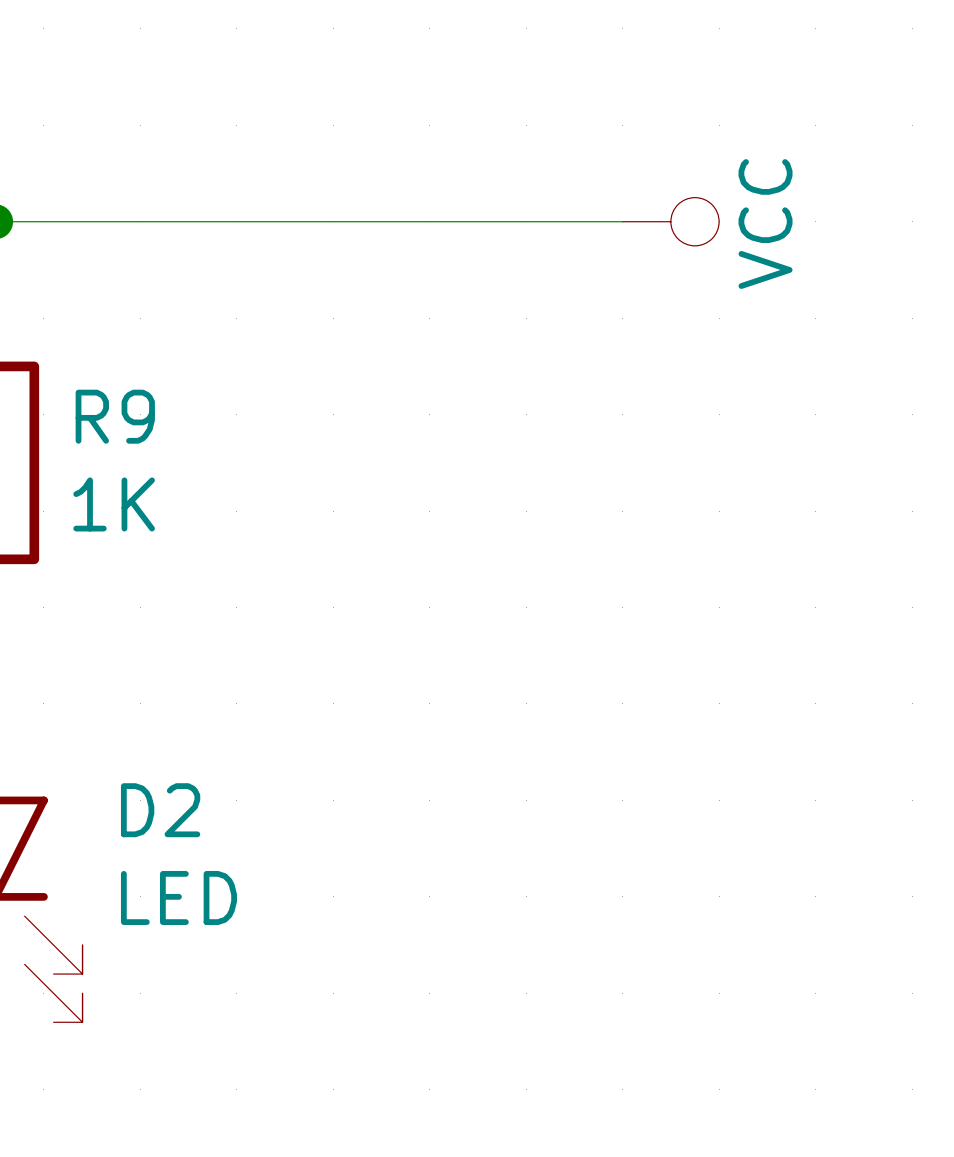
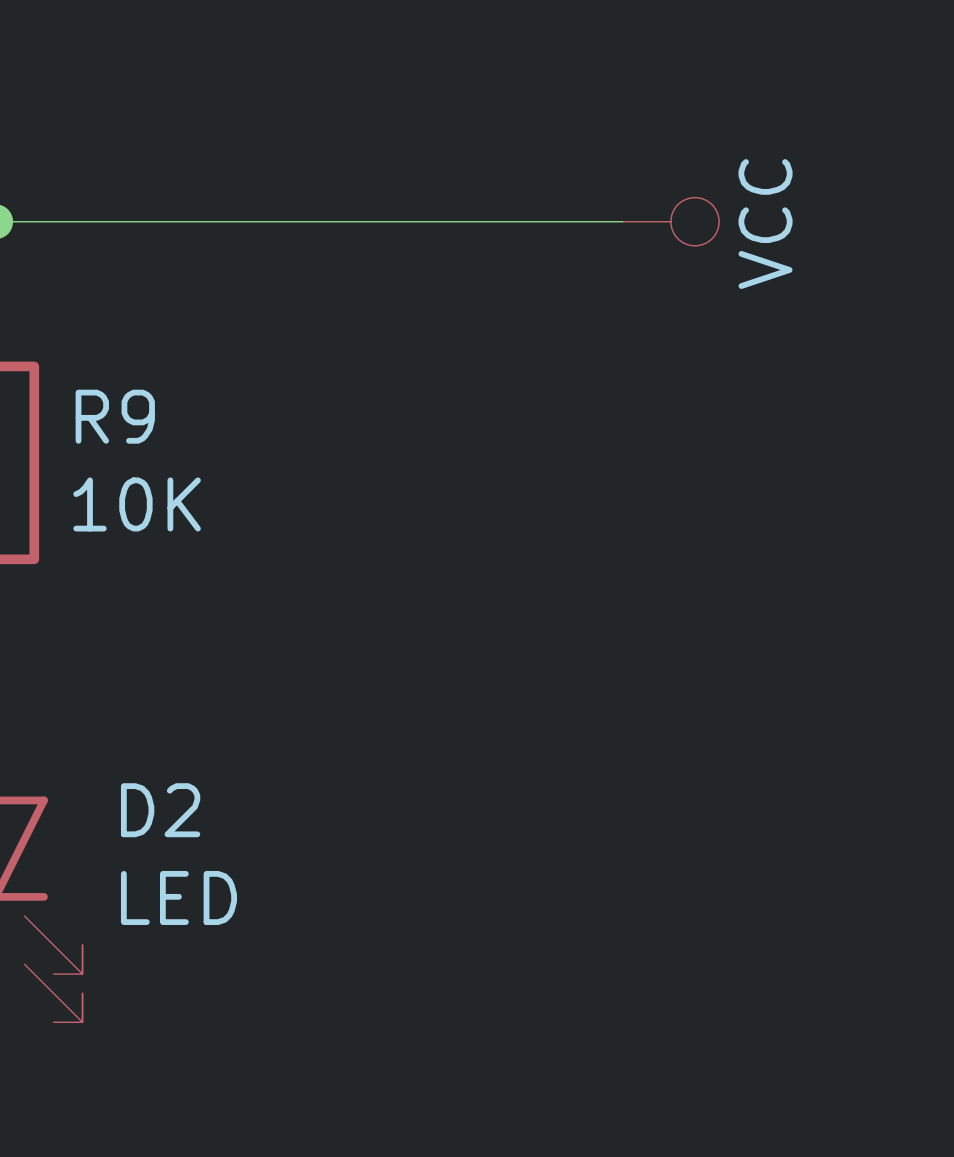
R9 value: 1K (114, 504) -> 10K (137, 504)

